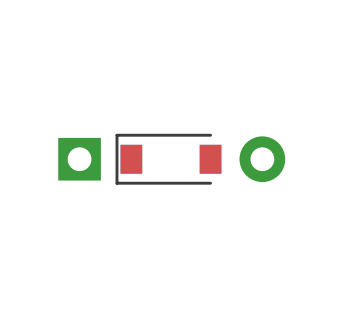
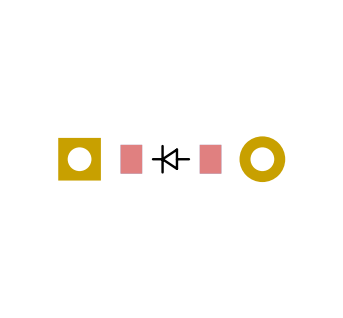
part footprint: [58, 133, 286, 185] -> [58, 136, 286, 183]

